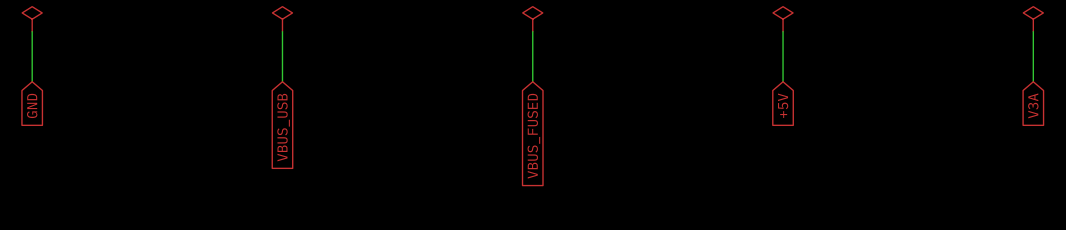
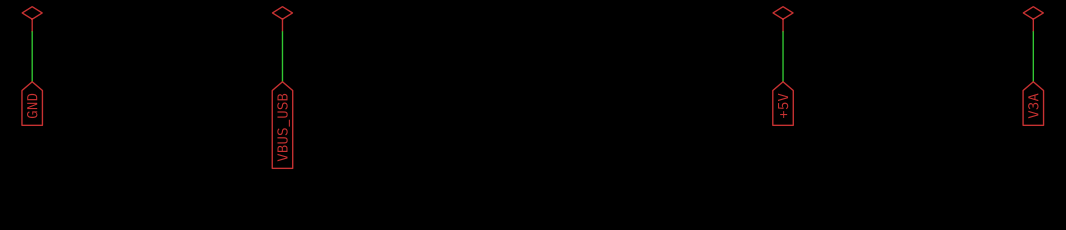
power symbol: (532, 19) -> none
wire: (532, 31) (532, 81) -> none
global label: VBUS_FUSED (533, 136) -> none

